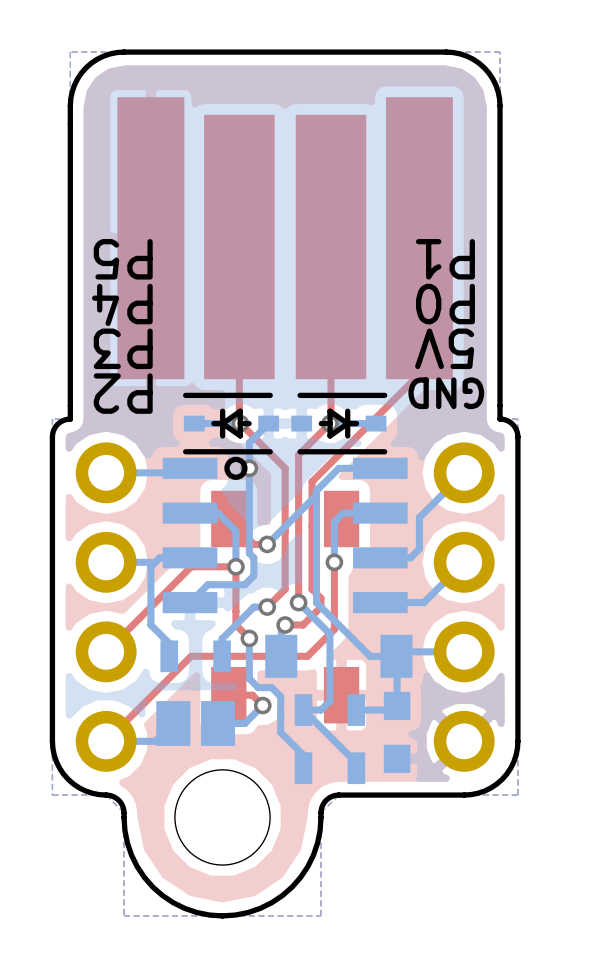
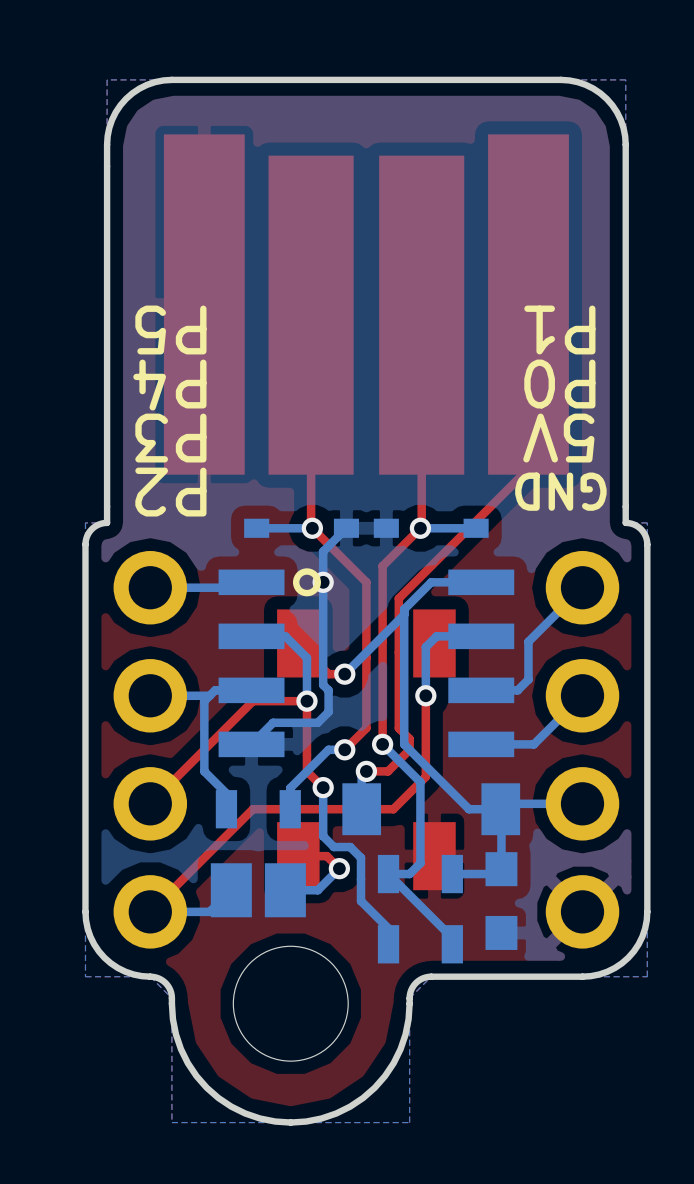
part footprint: [183, 392, 280, 455] -> [244, 518, 360, 538]
part footprint: [291, 392, 388, 455] -> [373, 518, 489, 538]

